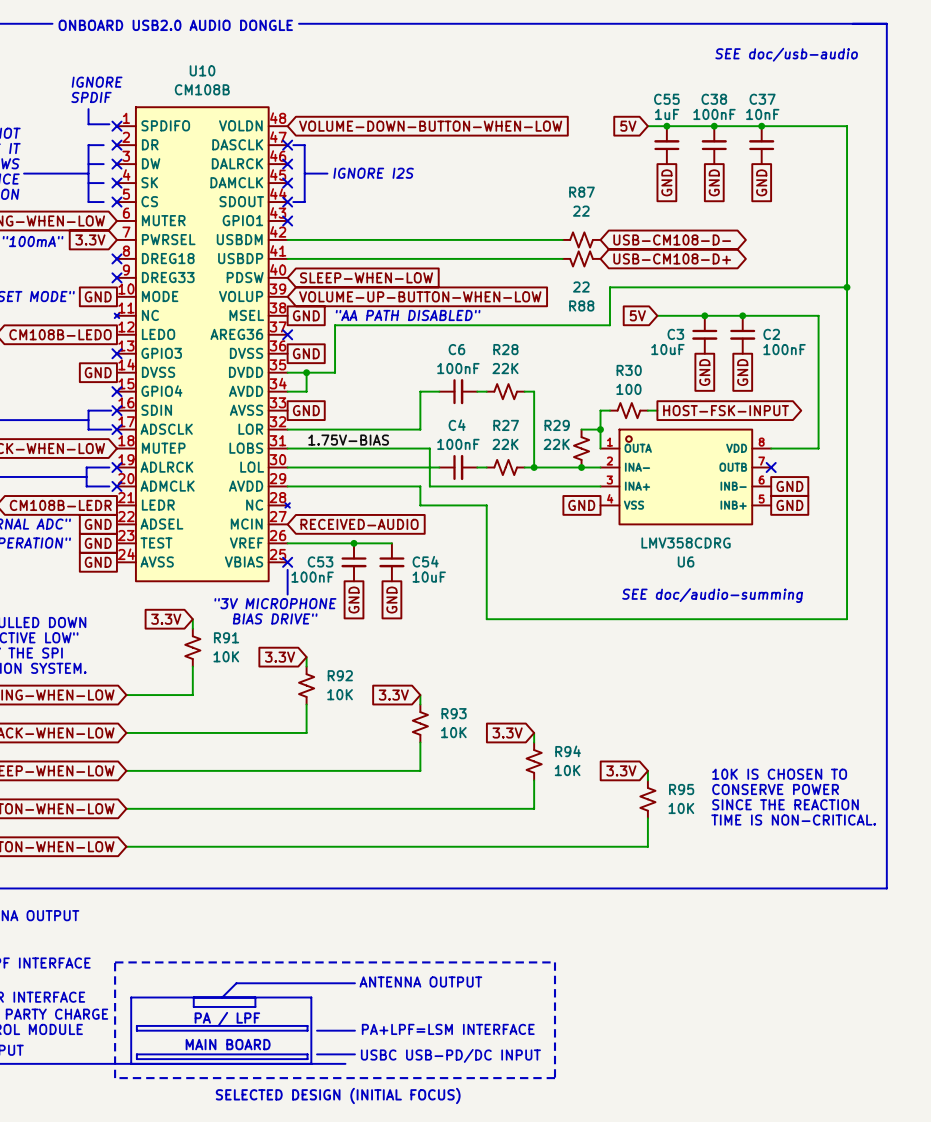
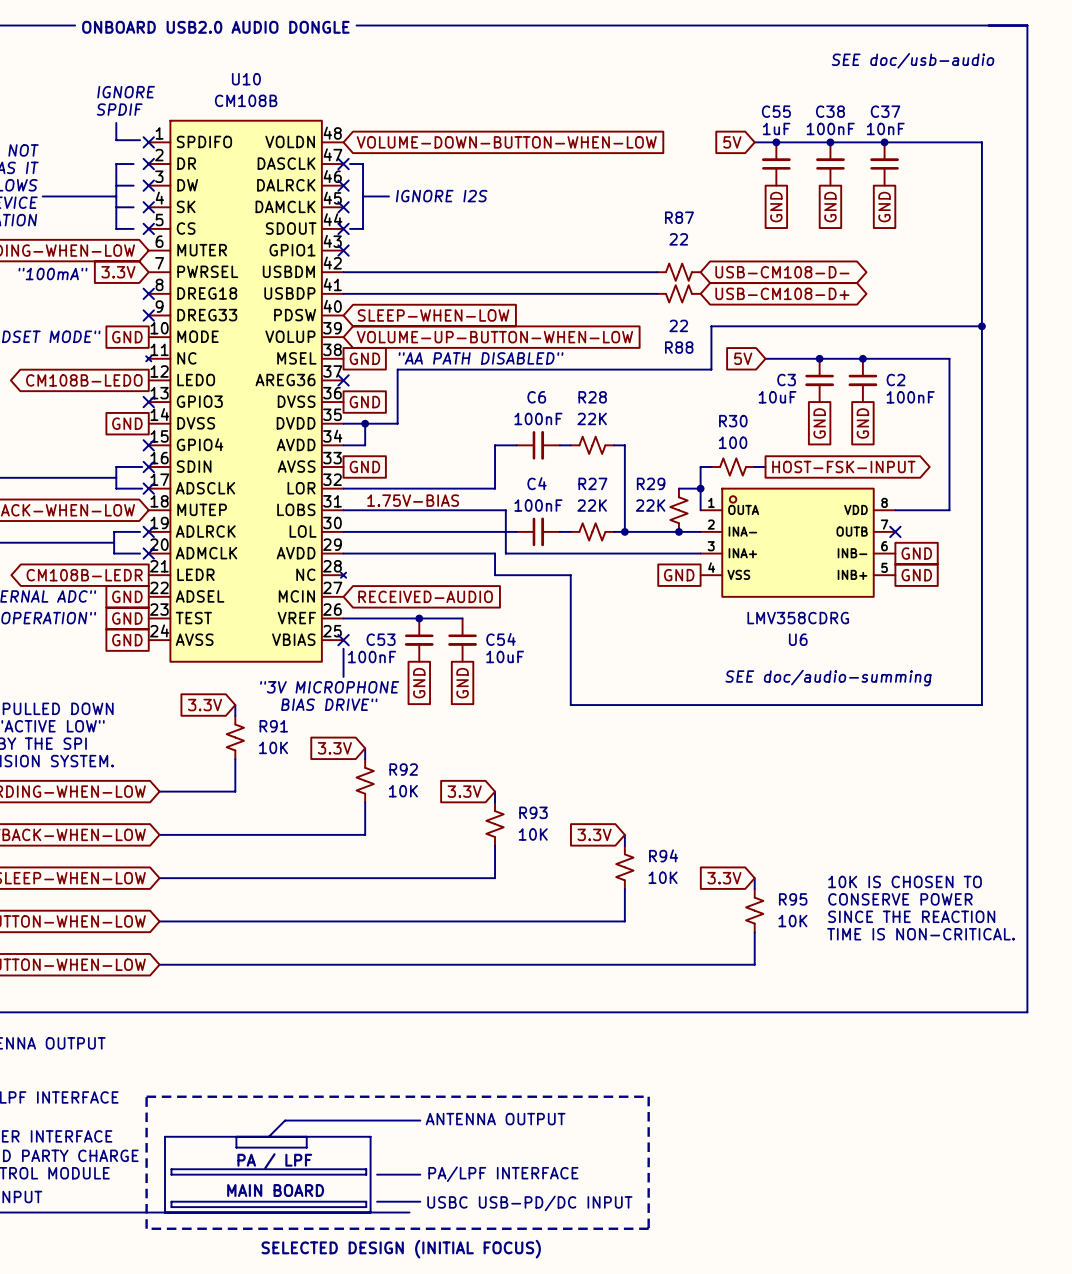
text: PA+LPF=LSM INTERFACE (448, 1029) -> PA/LPF INTERFACE (503, 1174)

